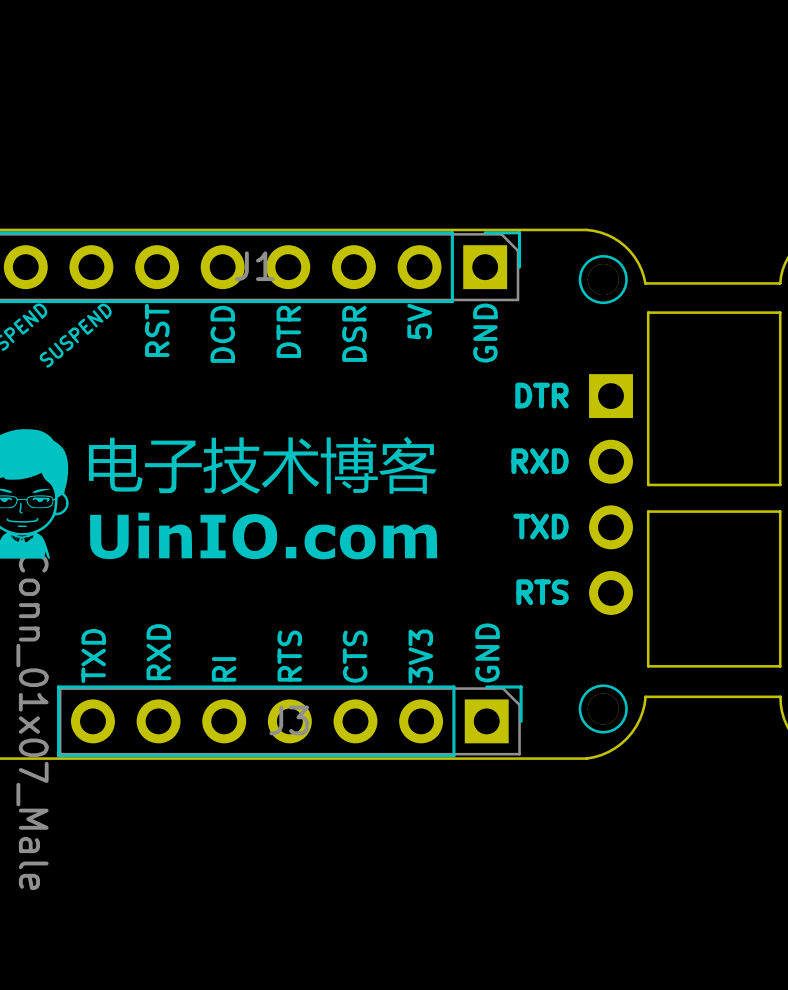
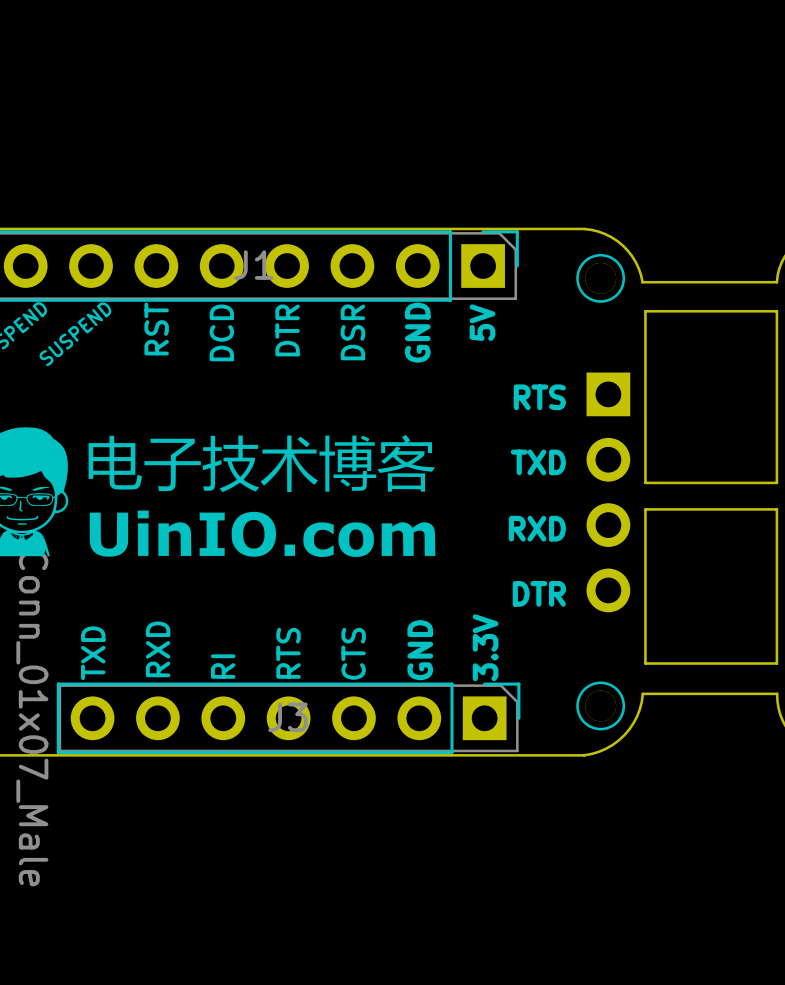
text position: 5V (419, 321) -> 5V (482, 322)
text position: GND (485, 333) -> GND (417, 332)
text position: DTR (542, 395) -> DTR (539, 593)
text position: RXD (540, 461) -> RXD (537, 528)
text position: TXD (541, 526) -> TXD (538, 462)
text position: RTS (542, 592) -> RTS (539, 397)
text: GND (487, 652) -> 3.3V (485, 647)
text: 3V3 (420, 656) -> GND (420, 650)

